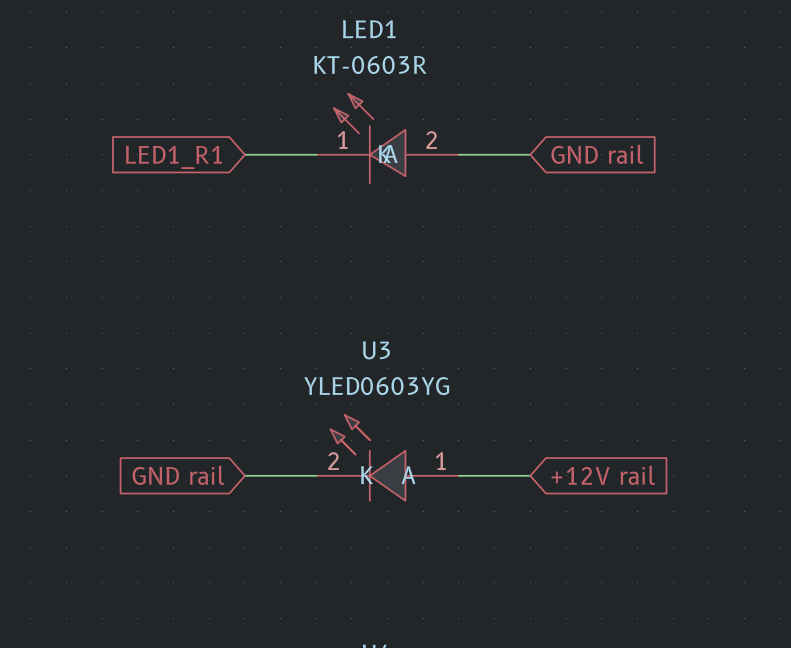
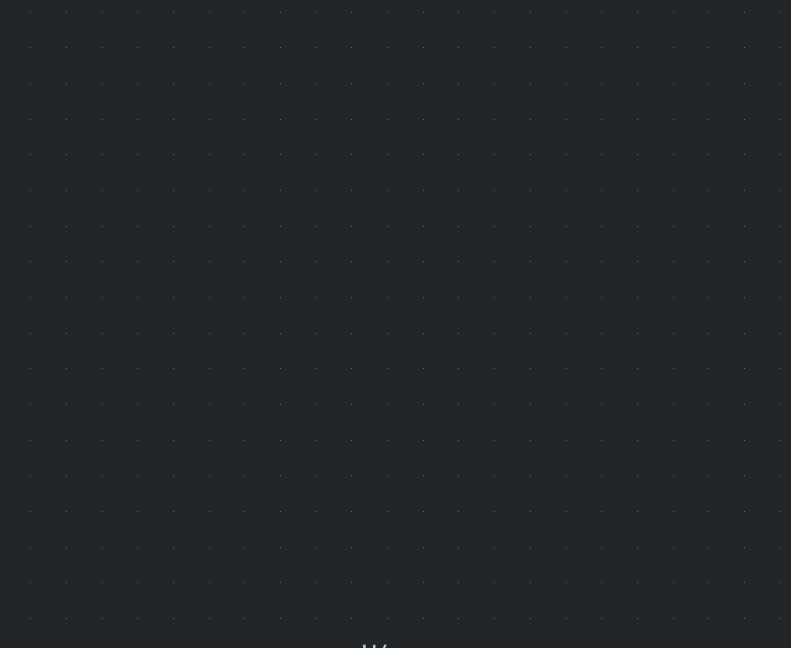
LED1: KT-0603R (387, 138) -> none
wire: (244, 154) (316, 154) -> none
wire: (458, 154) (530, 154) -> none
global label: GND rail (597, 154) -> none
global label: LED1_R1 (173, 157) -> none
U3: YLED0603YG (387, 457) -> none
global label: GND rail (178, 475) -> none
wire: (244, 475) (316, 475) -> none
wire: (458, 475) (530, 475) -> none
global label: +12V rail (603, 475) -> none

